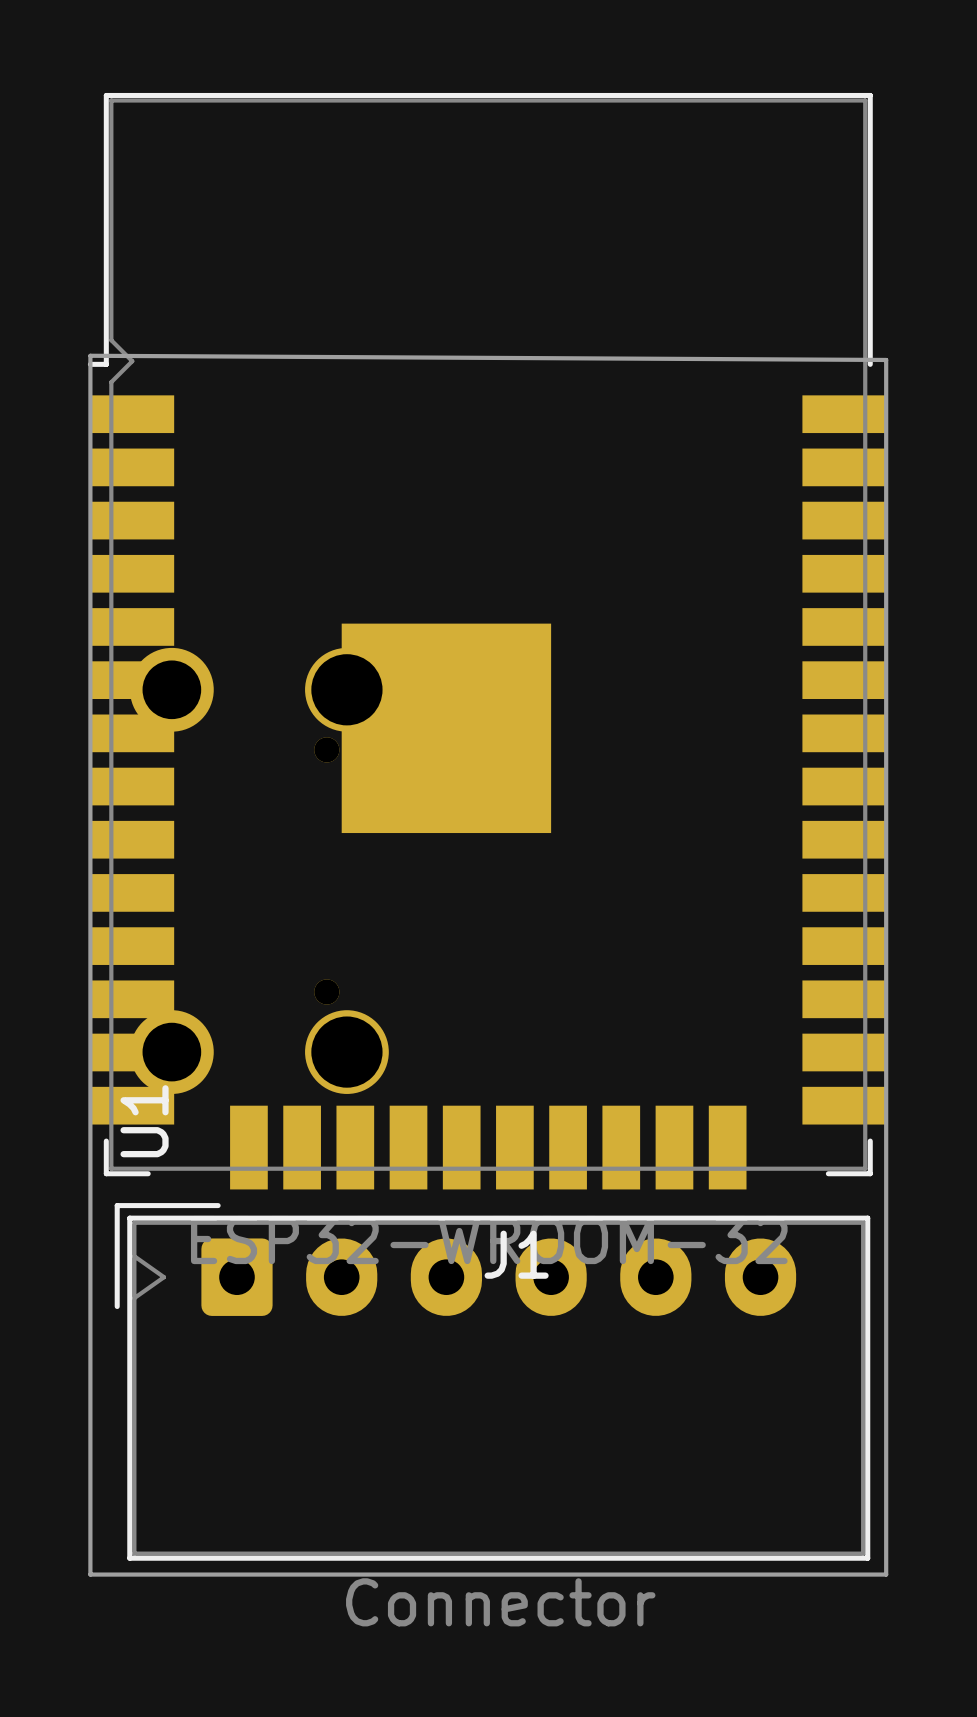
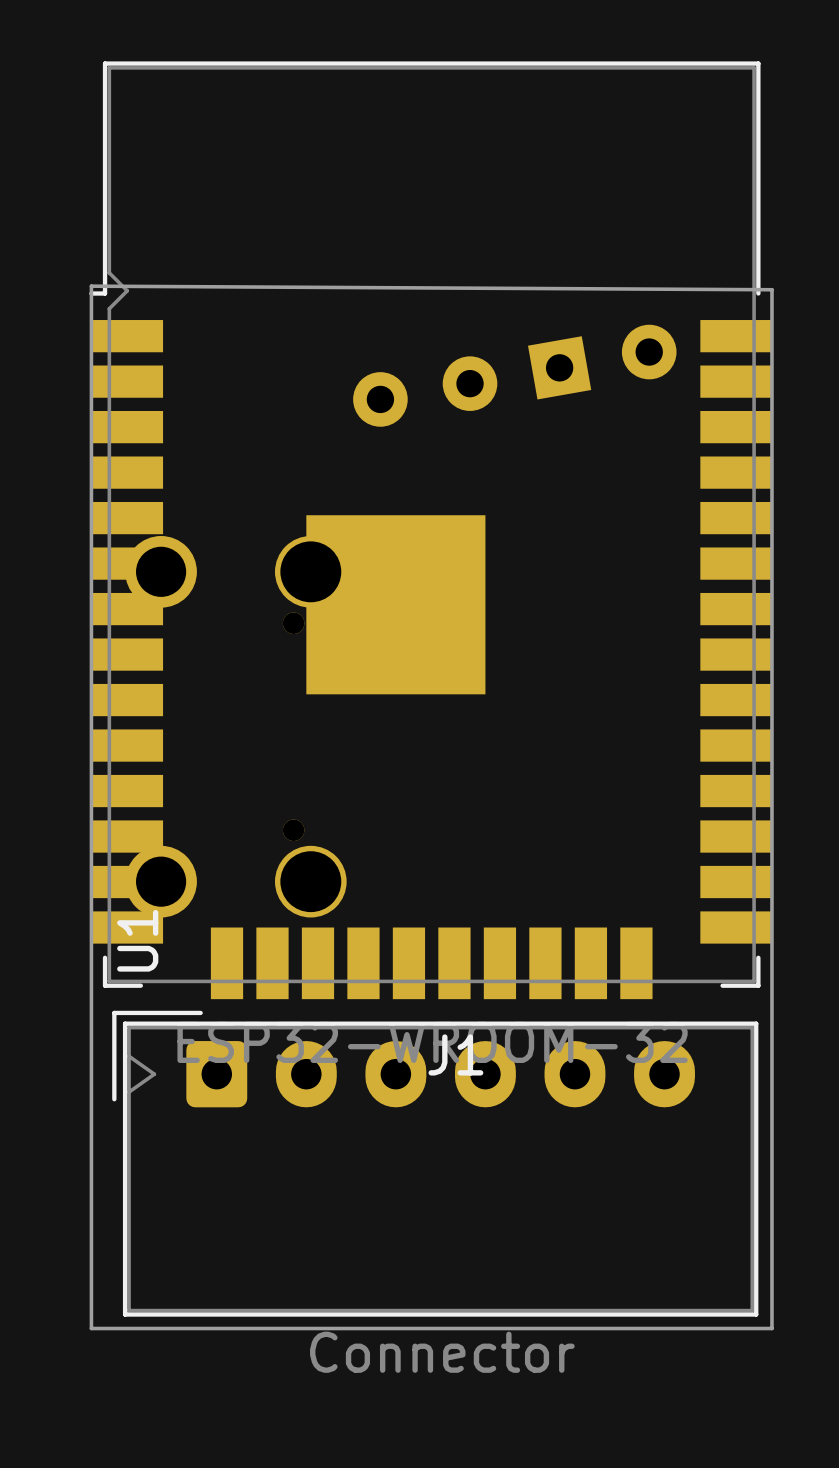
part: none -> (514, 375)

